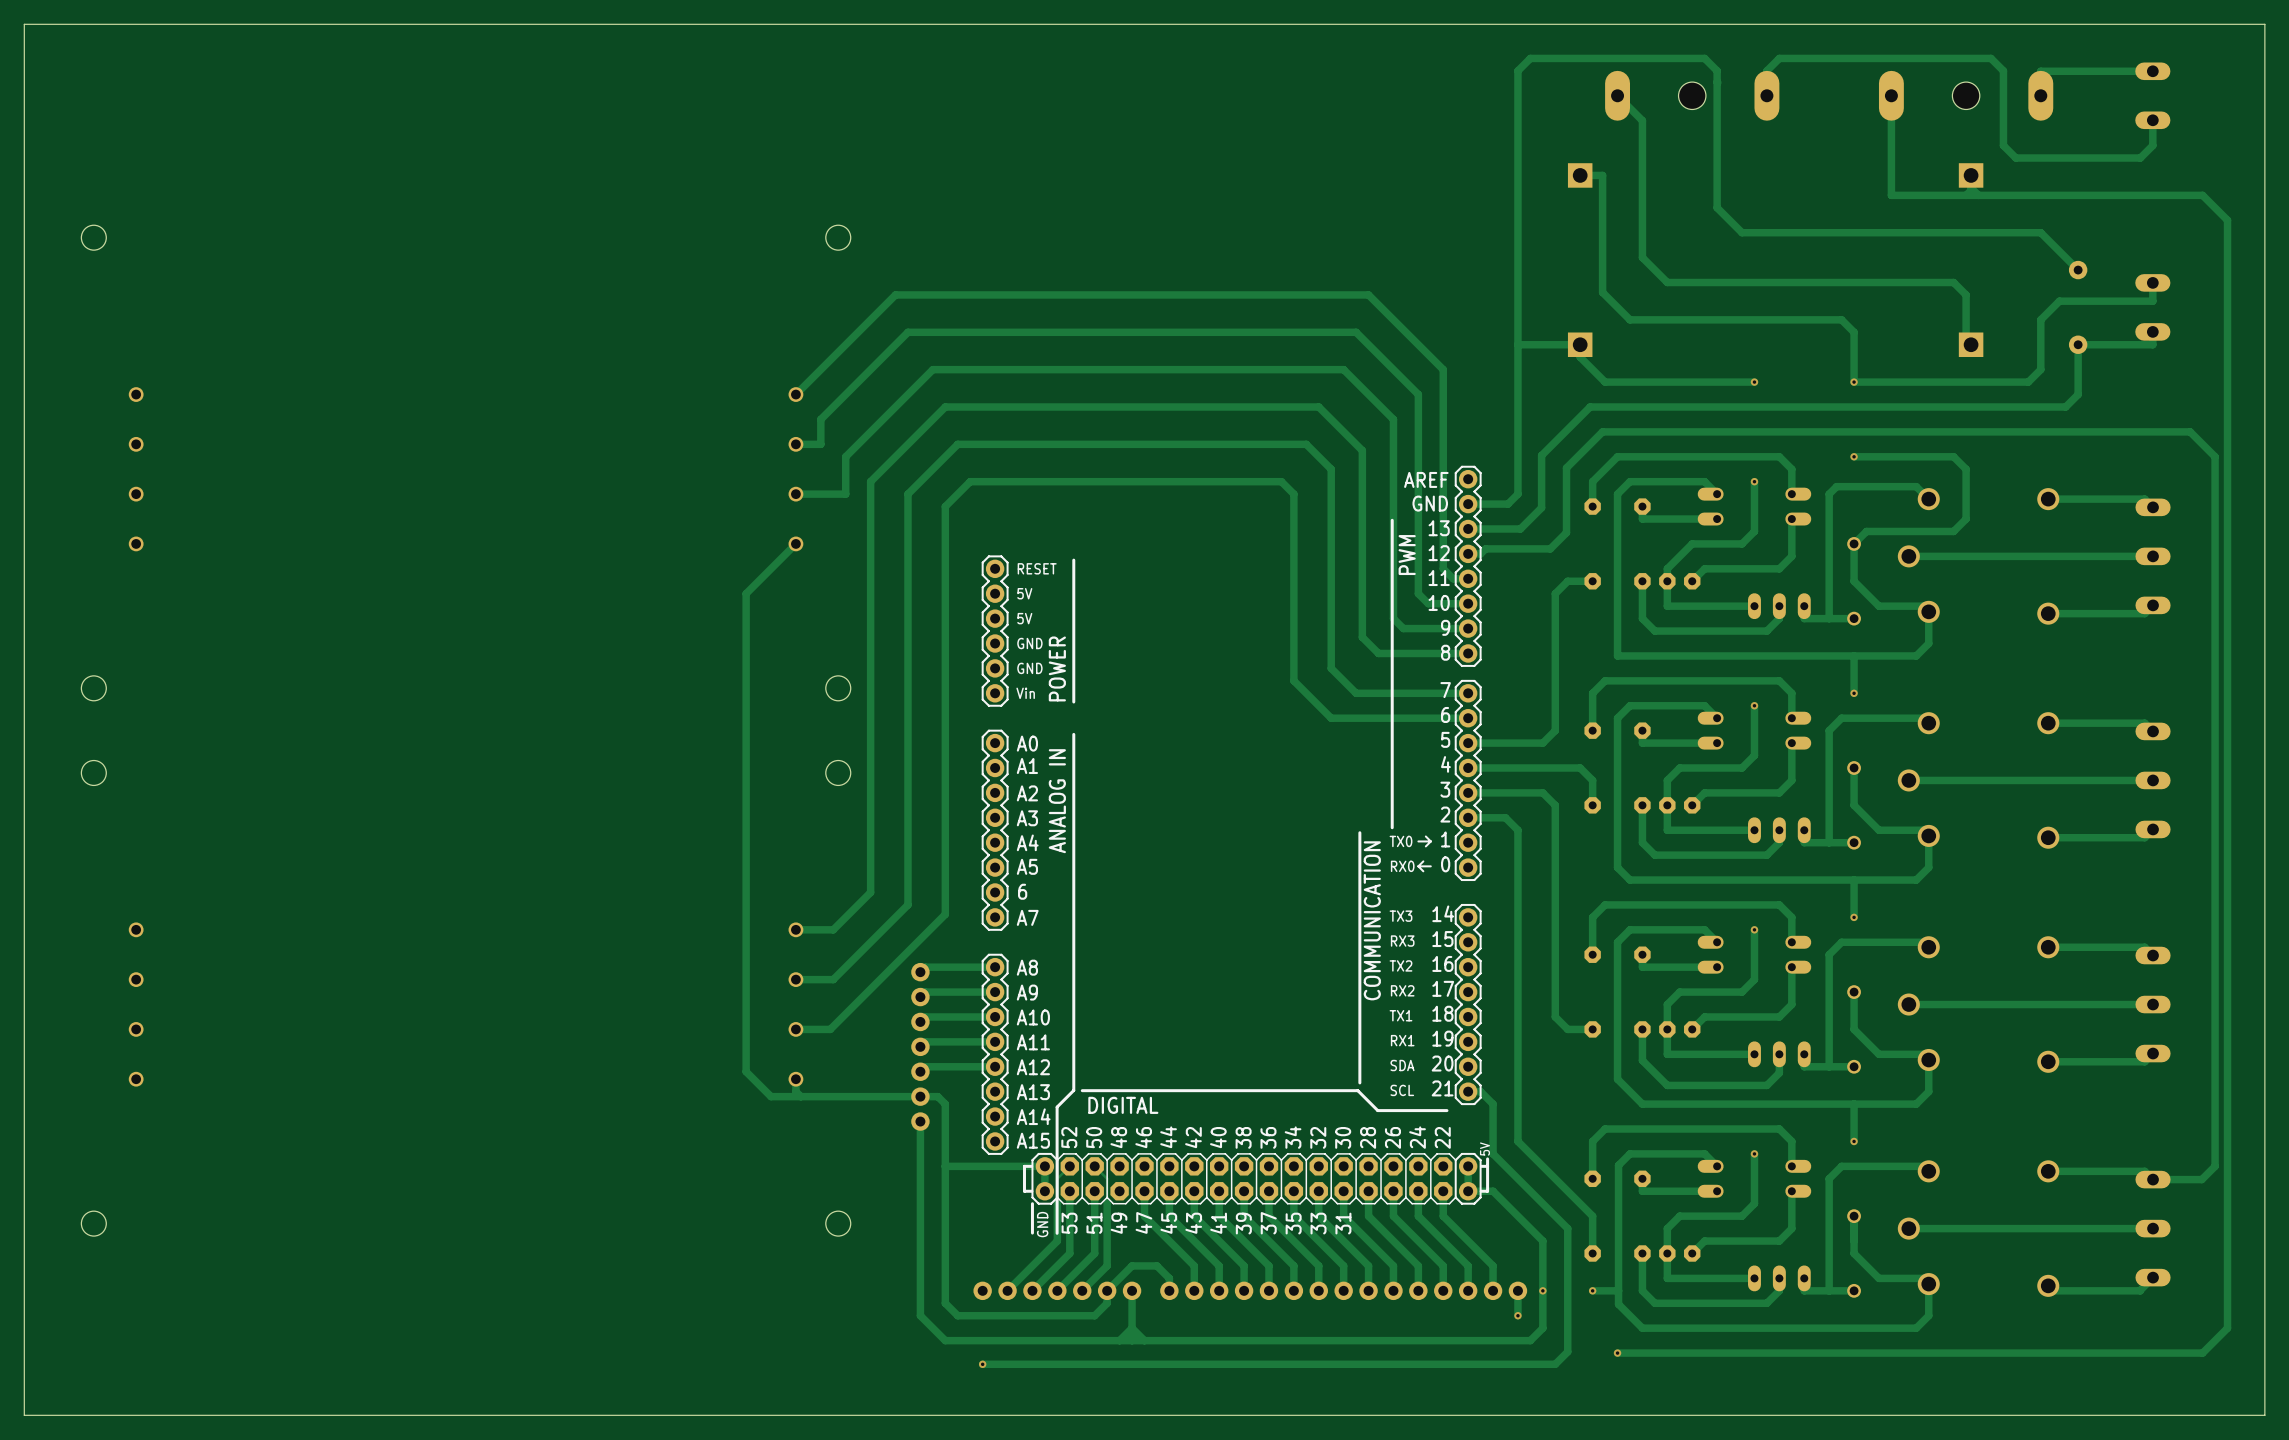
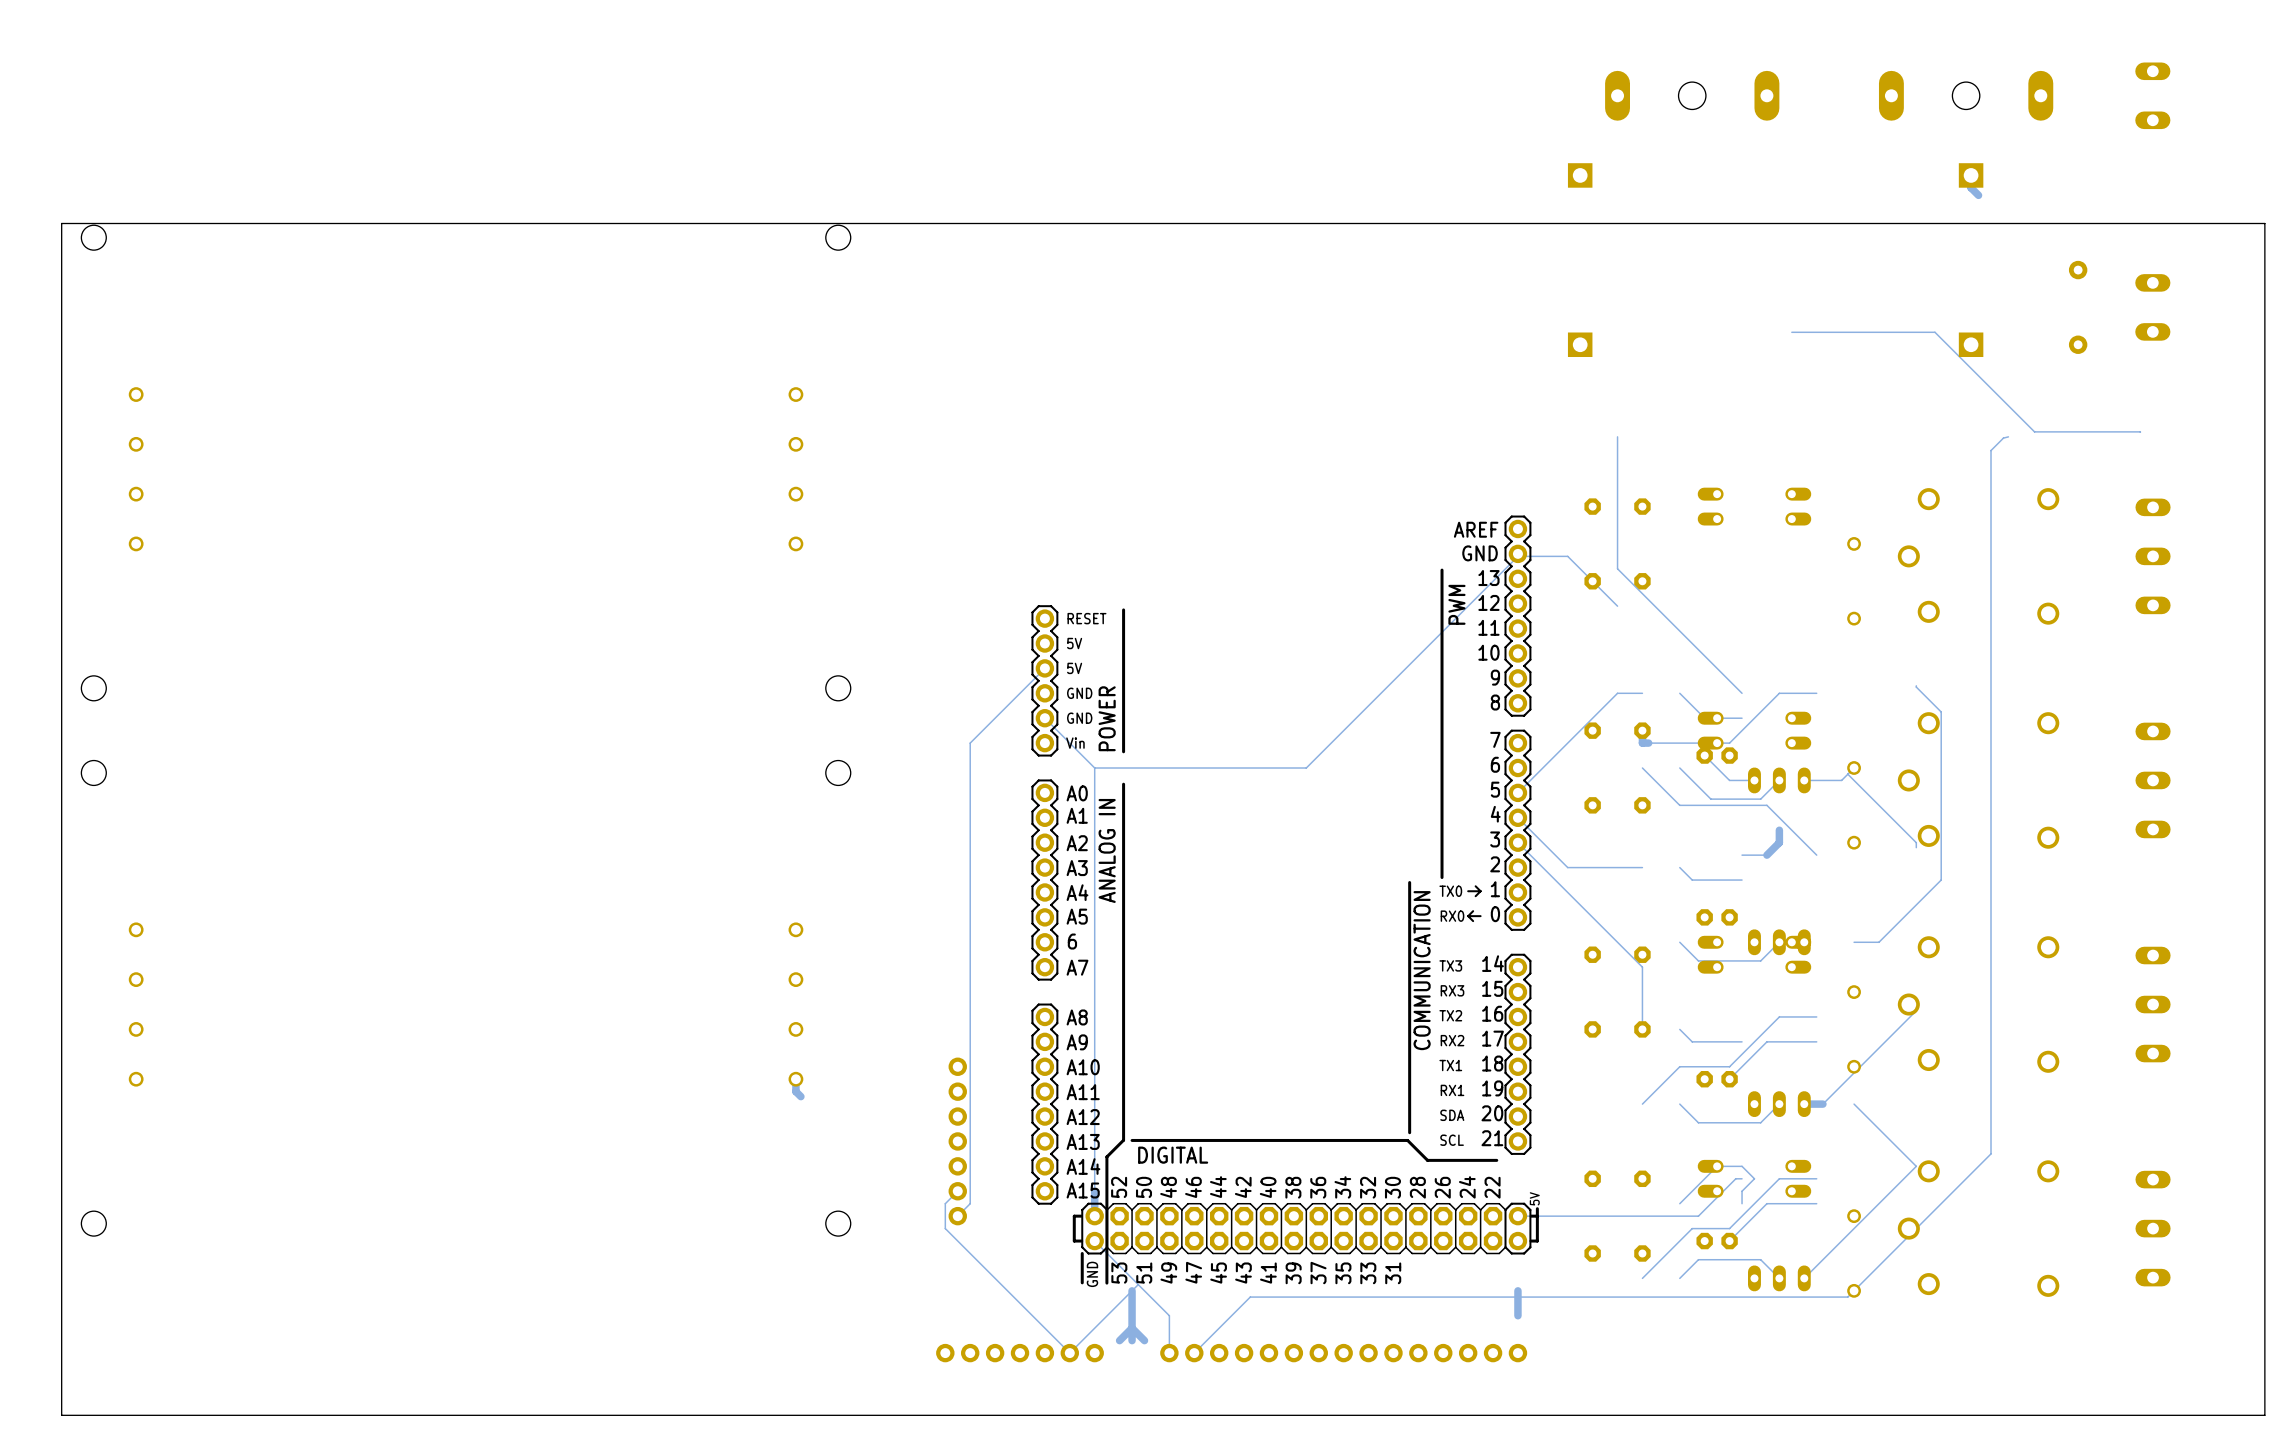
track: (2152, 71) (2040, 71) (2040, 95) -> none
track: (1717, 82) (1717, 70) (1704, 58) (1530, 58) (1517, 70) (1517, 494) (1507, 504) (1468, 504) -> none
track: (1717, 83) (1717, 207) (1742, 232) (2040, 232) (2078, 270) -> none
track: (1617, 95) (1642, 120) (1642, 257) (1667, 282) (1953, 282) (1966, 294) (1966, 339) (1971, 344) -> none
track: (1766, 95) (1766, 70) (1779, 58) (1991, 58) (2003, 70) (2003, 145) (2015, 158) (2140, 158) (2152, 145) (2152, 120) -> none
track: (1891, 95) (1891, 195) (2202, 195) (2227, 220) (2227, 1328) (2202, 1353) (1617, 1353) -> none
track: (1580, 175) (1602, 175) (1602, 292) (1629, 319) (1841, 319) (1854, 332) (1854, 382) (2028, 382) (2040, 369) (2040, 319) (2059, 301) (2152, 301) (2152, 282) -> none
board edge: (2264, 223) (2264, 24) (24, 24) (24, 1415) (61, 1415) -> (2264, 223) (61, 223) (61, 1415)
track: (2152, 331) (2152, 344) (2078, 344) (2078, 394) (2065, 406) (1590, 406) (1541, 455) (1541, 507) (1520, 528) (1468, 528) -> none
track: (1517, 344) (1580, 344) (1580, 357) (1605, 382) (1754, 382) -> none
via: (1754, 382) -> none
via: (1854, 382) -> none
track: (795, 394) (895, 294) (1368, 294) (1443, 369) (1443, 568) (1453, 578) (1468, 578) -> none
track: (2034, 431) (1602, 431) (1566, 467) (1566, 532) (1550, 548) (1485, 548) (1480, 553) (1468, 553) -> (2034, 431) (1934, 332) (1791, 332)
track: (2140, 431) (2190, 431) (2215, 456) (2215, 1166) (2201, 1179) (2153, 1179) (2144, 1171) (2048, 1171) -> (2140, 431) (2140, 432)
track width: thick (2140, 431) (2034, 431) -> thin (2140, 431) (2034, 431)
track: none -> (2008, 436) (2003, 438) (1991, 450) (1991, 1153) (1847, 1297) (1250, 1297) (1194, 1353)
track: (795, 444) (820, 444) (820, 419) (907, 332) (1356, 332) (1418, 394) (1418, 593) (1428, 603) (1468, 603) -> none
track: (1854, 456) (1953, 456) (1966, 469) (1966, 519) (1953, 531) (1866, 531) (1854, 543) (1854, 581) (1878, 606) (1923, 606) (1928, 611) (1928, 643) (1916, 655) (1617, 655) (1617, 568) -> (1742, 693) (1617, 568)
via: (1854, 456) -> none
track: (1754, 481) (1754, 531) (1742, 543) (1692, 543) (1667, 568) (1667, 606) (1754, 606) -> none
via: (1754, 481) -> none
track: (795, 494) (845, 494) (845, 456) (932, 369) (1343, 369) (1393, 419) (1393, 618) (1403, 628) (1468, 628) -> none
track width: thick (1617, 494) (1617, 568) -> thin (1617, 494) (1617, 568)
track: (1717, 494) (1704, 481) (1629, 481) (1617, 494) -> (1617, 436) (1617, 494)
track: (1791, 494) (1791, 469) (1779, 456) (1617, 456) (1592, 481) (1592, 506) -> none
track: (1928, 499) (1916, 486) (1836, 486) (1829, 494) (1829, 618) -> none
track: (2048, 499) (2144, 499) (2153, 507) -> none
track: (1642, 506) (1642, 519) (1717, 519) -> none
track: (1791, 519) (1791, 556) (1779, 568) (1704, 568) (1692, 581) -> none
track: (795, 543) (746, 593) (746, 1071) (771, 1096) (937, 1096) (945, 1104) (945, 1203) -> (957, 1191) (945, 1203)
track: none -> (1517, 556) (1567, 556) (1617, 606)
track: none -> (1517, 556) (1306, 768) (1094, 768)
track: (2153, 556) (1908, 556) -> none
track: (1592, 581) (1567, 581) (1555, 593) (1555, 730) (1542, 743) (1468, 743) -> none
track: (1642, 581) (1642, 618) (1654, 631) (1766, 631) (1779, 618) (1779, 606) -> none
part: (1679, 581) -> none
track: (2153, 605) (2144, 613) (2048, 613) -> none
part: (1779, 606) -> none
track: (1804, 606) (1804, 618) (1854, 618) -> none
track: (1468, 653) (1378, 653) (1362, 637) (1362, 450) (1318, 406) (945, 406) (870, 481) (870, 892) (833, 929) (795, 929) -> none
track: (1854, 655) (1854, 693) -> none
track: none -> (1044, 668) (970, 743) (970, 1203) (957, 1216)
track: (1468, 693) (1356, 693) (1331, 668) (1331, 469) (1306, 444) (957, 444) (907, 494) (907, 904) (833, 979) (795, 979) -> none
track: none -> (1642, 693) (1617, 693) (1517, 792)
track: none -> (1679, 693) (1704, 718) (1742, 718)
track: none -> (1816, 693) (1779, 693) (1729, 743) (1717, 743)
via: (1854, 693) -> none
track: (1754, 705) (1754, 755) (1742, 768) (1679, 768) (1667, 780) (1667, 830) (1754, 830) -> none
via: (1754, 705) -> none
track: none -> (1044, 718) (1094, 768)
track: (1468, 718) (1331, 718) (1293, 680) (1293, 494) (1281, 481) (970, 481) (945, 506) (945, 914) (830, 1029) (795, 1029) -> none
track: (1717, 718) (1704, 705) (1629, 705) (1617, 718) (1617, 867) (1629, 880) (1692, 880) -> (1679, 867) (1692, 880)
track: (1791, 718) (1791, 693) (1779, 680) (1605, 680) (1592, 693) (1592, 730) -> none
track: (1928, 723) (1923, 718) (1841, 718) (1829, 730) (1829, 842) -> none
track: (2048, 723) (2144, 723) (2153, 731) -> none
track width: thick (1717, 743) (1648, 743) -> thin (1717, 743) (1648, 743)
track: (1791, 743) (1791, 780) (1779, 792) (1704, 792) (1692, 805) -> none
track: none -> (1704, 755) (1729, 780) (1754, 780)
part: none -> (1717, 755)
track: none -> (1094, 768) (1094, 1191)
track: (1468, 768) (1580, 768) (1592, 780) (1592, 805) -> none
track: none -> (1642, 768) (1679, 805) (1766, 805) (1816, 855)
track: none -> (1679, 768) (1710, 799) (1760, 799) (1779, 780)
track: (1854, 768) (1854, 805) (1878, 830) (1923, 830) (1928, 835) (1928, 867) (1916, 880) (1742, 880) -> (1854, 768) (1841, 780) (1804, 780)
track: none -> (1847, 774) (1916, 842) (1916, 847)
track: (2153, 780) (1903, 780) -> none
track: (1468, 792) (1542, 792) (1555, 805) (1555, 1016) (1567, 1029) (1592, 1029) -> none
track: (1642, 805) (1642, 842) (1654, 855) (1742, 855) -> none
part: (1679, 805) -> none
track: (1468, 817) (1505, 817) (1517, 830) (1517, 1141) (1592, 1216) (1592, 1253) -> none
track: none -> (1517, 817) (1567, 867) (1642, 867)
track: (2153, 829) (2144, 837) (2048, 837) -> none
part position: (1779, 830) -> (1779, 780)
track: (1804, 830) (1804, 842) (1854, 842) -> none
part position: (1235, 850) -> (1285, 900)
track width: thick (1766, 855) (1742, 855) -> thin (1766, 855) (1742, 855)
track width: thick (1742, 880) (1692, 880) -> thin (1742, 880) (1692, 880)
track: (1854, 880) (1854, 917) -> none
part: none -> (1717, 917)
via: (1854, 917) -> none
track: (1754, 929) (1754, 979) (1742, 992) (1679, 992) (1667, 1004) (1667, 1054) (1754, 1054) -> none
via: (1754, 929) -> none
track: (1717, 942) (1704, 929) (1629, 929) (1617, 942) (1617, 1079) (1642, 1104) (1804, 1104) -> none
track: none -> (1779, 942) (1760, 960) (1698, 960) (1679, 942)
part: none -> (1779, 942)
track: (1791, 942) (1791, 917) (1779, 904) (1605, 904) (1592, 917) (1592, 954) -> none
track: (1854, 942) (1841, 942) (1829, 954) (1829, 1066) -> none
track: (1878, 942) (1923, 942) (1928, 947) -> (1878, 942) (1941, 880) (1941, 711) (1916, 685)
track width: thick (1878, 942) (1854, 942) -> thin (1878, 942) (1854, 942)
track: (2048, 947) (2144, 947) (2153, 955) -> none
track: (1642, 954) (1642, 967) (1717, 967) -> none
track: (995, 967) (925, 967) (920, 972) -> none
track: (1791, 967) (1791, 1004) (1779, 1016) (1704, 1016) (1692, 1029) -> none
track: (995, 992) (925, 992) (920, 997) -> none
track: (1854, 992) (1854, 1029) (1878, 1054) (1923, 1054) (1928, 1060) (1928, 1091) (1916, 1104) (1822, 1104) -> (1916, 1009) (1822, 1104)
track: (2153, 1004) (1908, 1004) -> none
track: (995, 1016) (925, 1016) (920, 1021) -> none
track: none -> (1816, 1016) (1779, 1016) (1729, 1066) (1679, 1066) (1642, 1104)
track: (1642, 1029) (1642, 1060) (1667, 1085) (1766, 1085) (1779, 1072) (1779, 1054) -> (1642, 1029) (1642, 967) (1517, 842)
track: none -> (1679, 1029) (1692, 1041) (1742, 1041)
part: (1679, 1029) -> none
track: (995, 1041) (925, 1041) (920, 1046) -> none
track: none -> (1816, 1041) (1766, 1041) (1729, 1079)
part: (920, 1046) -> none
track: (2153, 1053) (2144, 1061) (2048, 1061) -> none
part position: (1779, 1054) -> (1779, 1104)
track: (1804, 1054) (1804, 1066) (1854, 1066) -> none
track: (995, 1066) (925, 1066) (920, 1071) -> none
part: none -> (1717, 1079)
track: (1468, 1091) (1480, 1091) (1493, 1104) (1493, 1153) (1567, 1228) (1567, 1351) (1555, 1364) (982, 1364) -> none
track: none -> (1779, 1104) (1760, 1122) (1698, 1122) (1679, 1104)
track: (1854, 1104) (1854, 1141) -> (1854, 1104) (1916, 1166) (1804, 1278)
track: (920, 1121) (920, 1315) (945, 1340) (1530, 1340) (1542, 1328) (1542, 1241) (1493, 1191) (1468, 1191) (1468, 1166) -> none
part: none -> (957, 1141)
via: (1854, 1141) -> none
track: (1754, 1153) (1754, 1203) -> (1816, 1178) (1779, 1178) (1754, 1203)
via: (1754, 1153) -> none
track: (945, 1166) (1044, 1166) (1044, 1191) -> none
track: (1069, 1166) (1057, 1178) (1057, 1241) (1007, 1290) -> none
track: (1094, 1166) (1107, 1178) (1107, 1265) (1082, 1290) -> none
track: (1717, 1166) (1704, 1153) (1629, 1153) (1618, 1165) (1618, 1304) (1642, 1328) (1916, 1328) (1928, 1315) (1928, 1278) -> none
track: (1791, 1166) (1791, 1141) (1779, 1129) (1605, 1129) (1592, 1141) (1592, 1178) -> none
track: (1928, 1171) (1923, 1166) (1841, 1166) (1829, 1178) (1829, 1290) -> none
track: (1642, 1178) (1642, 1191) (1717, 1191) -> none
track: (1069, 1191) (1069, 1253) (1032, 1290) -> none
track: (1144, 1191) (1144, 1216) (1194, 1265) (1194, 1290) -> none
track: (1169, 1191) (1169, 1216) (1219, 1265) (1219, 1290) -> none
track: (1194, 1191) (1194, 1216) (1244, 1265) (1244, 1290) -> none
track: (1219, 1191) (1219, 1216) (1268, 1265) (1268, 1290) -> none
track: (1244, 1191) (1244, 1216) (1293, 1265) (1293, 1290) -> none
track: (1268, 1191) (1268, 1216) (1318, 1265) (1318, 1290) -> none
track: (1293, 1191) (1293, 1216) (1343, 1265) (1343, 1290) -> none
track: (1318, 1191) (1318, 1216) (1368, 1265) (1368, 1290) -> none
track: (1343, 1191) (1343, 1216) (1393, 1265) (1393, 1290) -> none
track: (1368, 1191) (1368, 1216) (1418, 1265) (1418, 1290) -> none
track: (1393, 1191) (1393, 1216) (1443, 1265) (1443, 1290) -> none
track: (1418, 1191) (1418, 1216) (1468, 1265) (1468, 1290) -> none
track: (1443, 1191) (1443, 1216) (1493, 1265) (1493, 1290) -> none
track: (1791, 1191) (1791, 1228) (1779, 1241) (1704, 1241) (1692, 1253) -> none
track width: thick (945, 1203) (945, 1228) -> thin (945, 1203) (945, 1228)
track: none -> (1742, 1203) (1742, 1191) (1754, 1178) (1742, 1166) (1717, 1166) (1679, 1203)
track width: thick (1754, 1203) (1742, 1216) -> thin (1754, 1203) (1742, 1216)
track: none -> (1816, 1203) (1766, 1203) (1729, 1241)
track: (1094, 1216) (1094, 1253) (1057, 1290) -> none
track: (1679, 1216) (1667, 1228) (1667, 1278) (1754, 1278) -> (1679, 1216) (1517, 1216)
track width: thick (1698, 1216) (1679, 1216) -> thin (1698, 1216) (1679, 1216)
track: (1742, 1216) (1698, 1216) -> (1742, 1178) (1735, 1178) (1698, 1216)
track: none -> (1742, 1216) (1729, 1228) (1692, 1228) (1642, 1278)
track: (1854, 1216) (1854, 1253) (1878, 1278) (1923, 1278) (1928, 1284) -> none
track: (945, 1228) (945, 1303) (957, 1315) (1094, 1315) (1107, 1303) (1107, 1290) (1132, 1265) (1156, 1265) (1169, 1278) (1169, 1290) -> (945, 1228) (1069, 1353) (1138, 1284)
track: (2153, 1228) (1908, 1228) -> none
track: none -> (1094, 1241) (1169, 1315) (1169, 1353)
track: (1642, 1253) (1642, 1290) (1654, 1303) (1766, 1303) (1779, 1290) (1779, 1278) -> (1679, 1278) (1698, 1259) (1760, 1259) (1779, 1278)
part position: (1679, 1253) -> (1717, 1241)
track: (2153, 1277) (2140, 1290) (2053, 1290) (2048, 1285) -> none
track: (1804, 1278) (1804, 1290) (1854, 1290) -> none
part position: (1057, 1290) -> (1020, 1353)
part position: (1343, 1290) -> (1343, 1353)
via: (1542, 1290) -> none
via: (1592, 1290) -> none
track: (1618, 1290) (1592, 1290) -> none
via: (1517, 1315) -> none
via: (1617, 1353) -> none
via: (982, 1364) -> none

